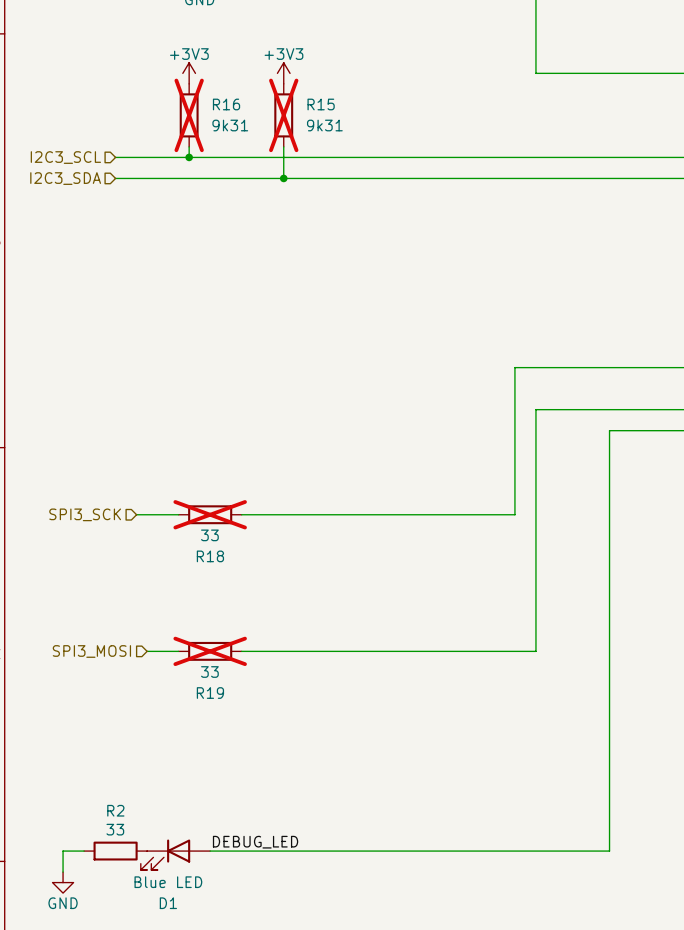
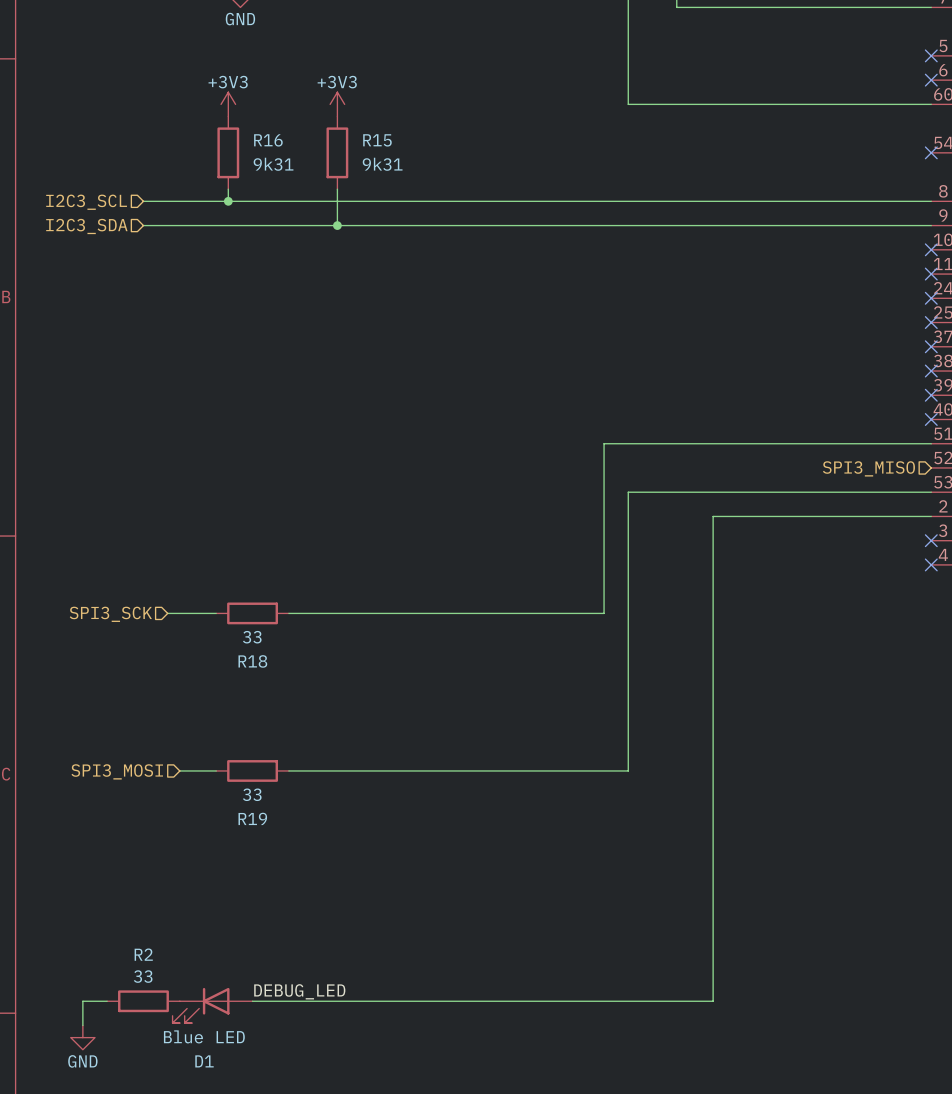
R16 do-not-place cross: (189, 115) -> none
R15 do-not-place cross: (283, 115) -> none
R18 do-not-place cross: (210, 514) -> none
R19 do-not-place cross: (210, 651) -> none

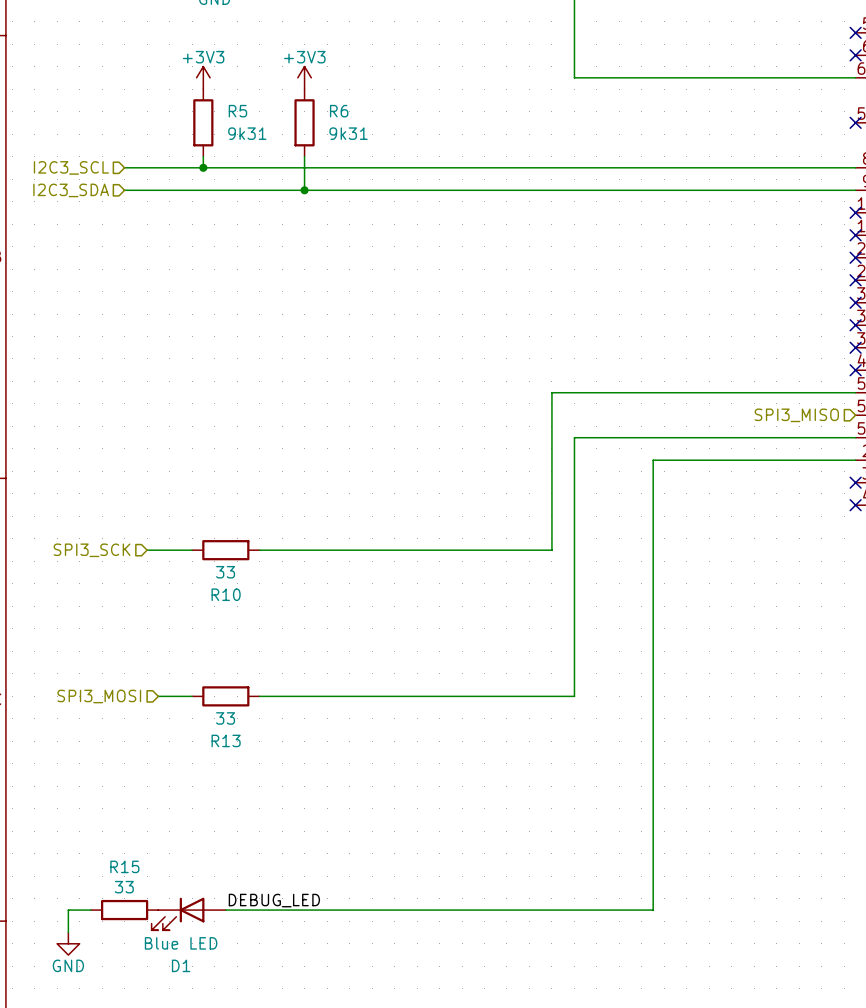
R16 name: R16 (268, 140) -> R5 (237, 111)
R15 name: R15 (377, 140) -> R6 (339, 111)
R18 name: R18 (252, 661) -> R10 (226, 594)
R19 name: R19 (252, 818) -> R13 (226, 740)
R2 name: R2 (143, 954) -> R15 (124, 866)

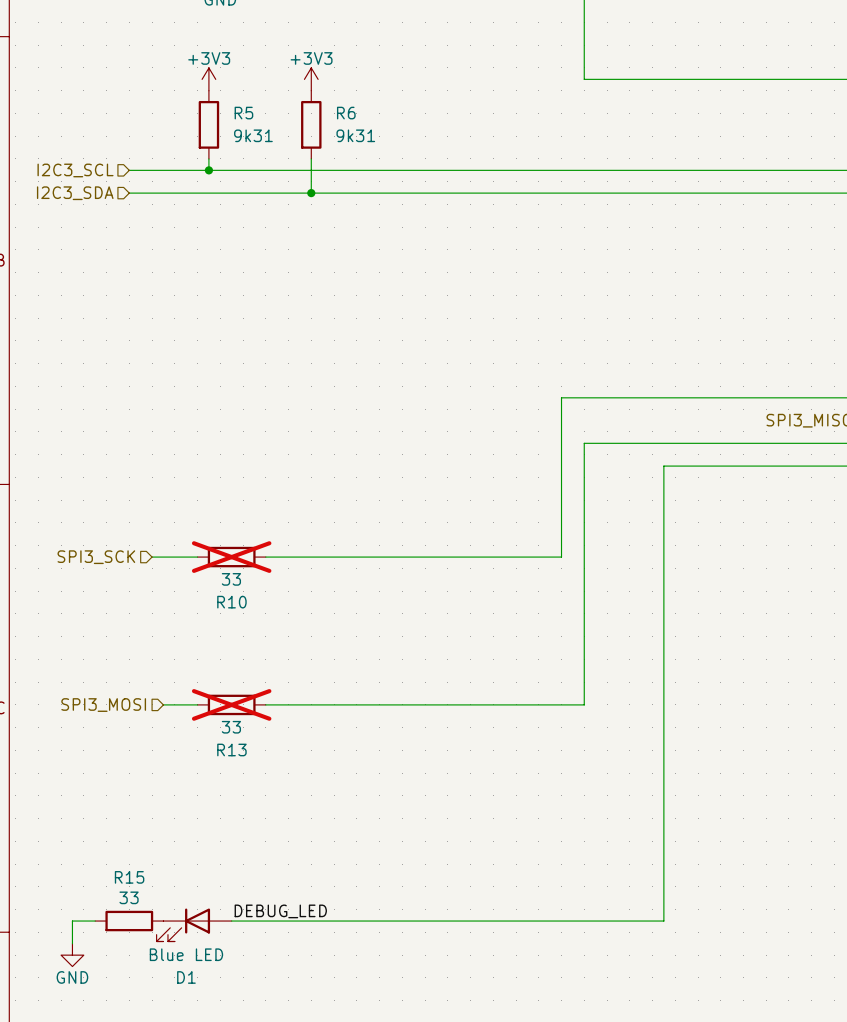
R10 do-not-place cross: none -> (231, 557)
R13 do-not-place cross: none -> (231, 704)

